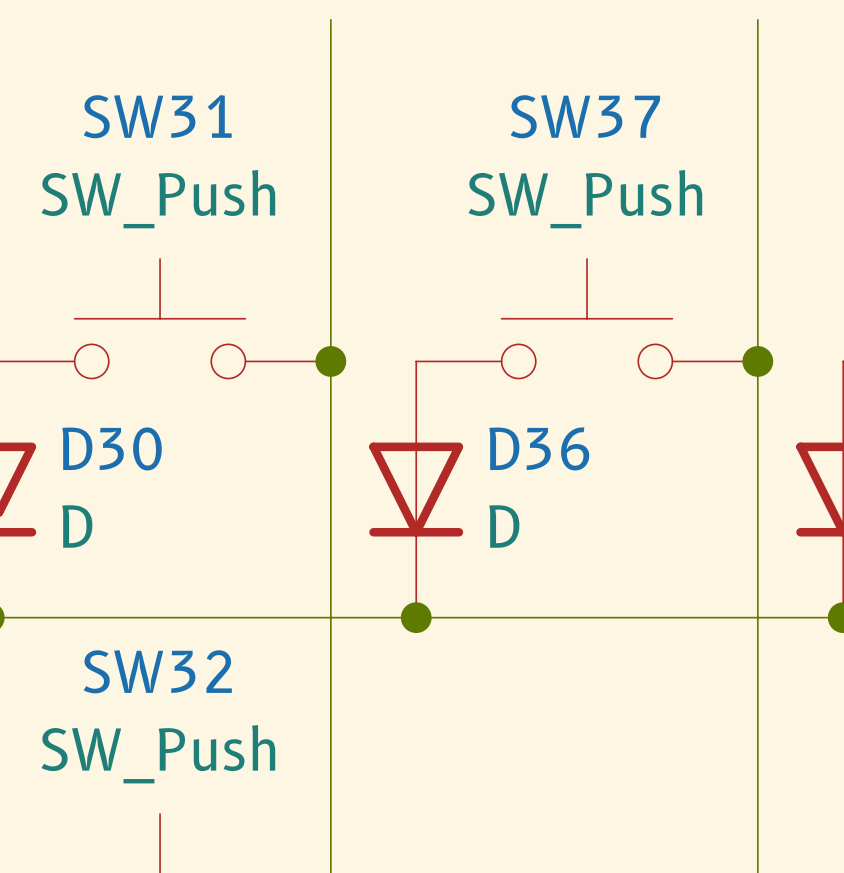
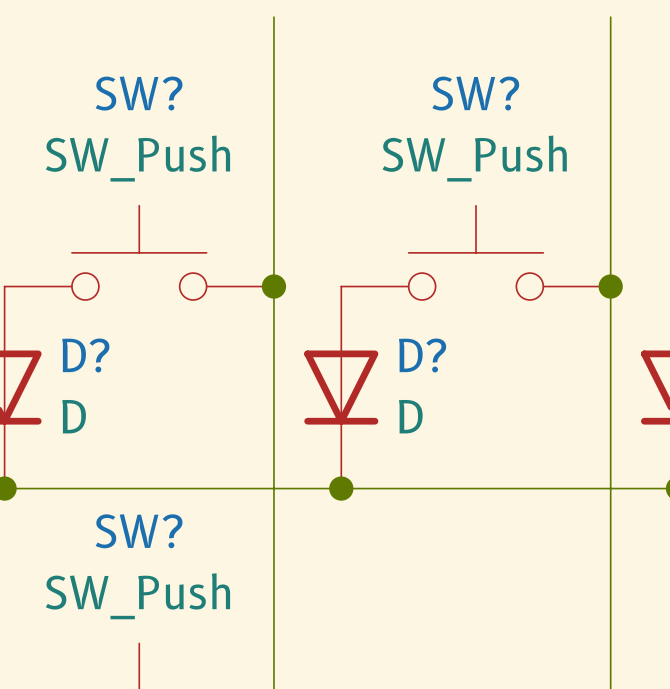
SW31 name: SW31 (157, 116) -> SW? (139, 93)
SW37 name: SW37 (585, 116) -> SW? (475, 93)
D30 name: D30 (112, 448) -> D? (85, 355)
D36 name: D36 (539, 448) -> D? (422, 355)
SW32 name: SW32 (157, 671) -> SW? (139, 531)

